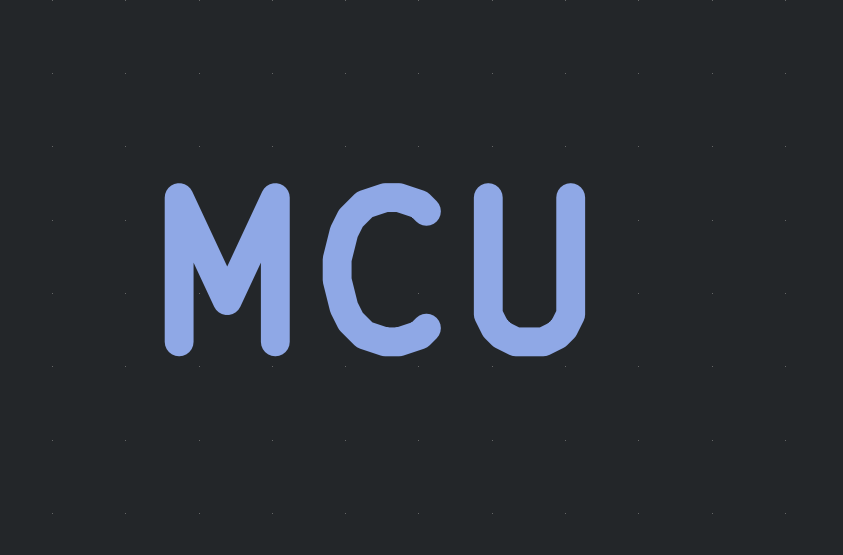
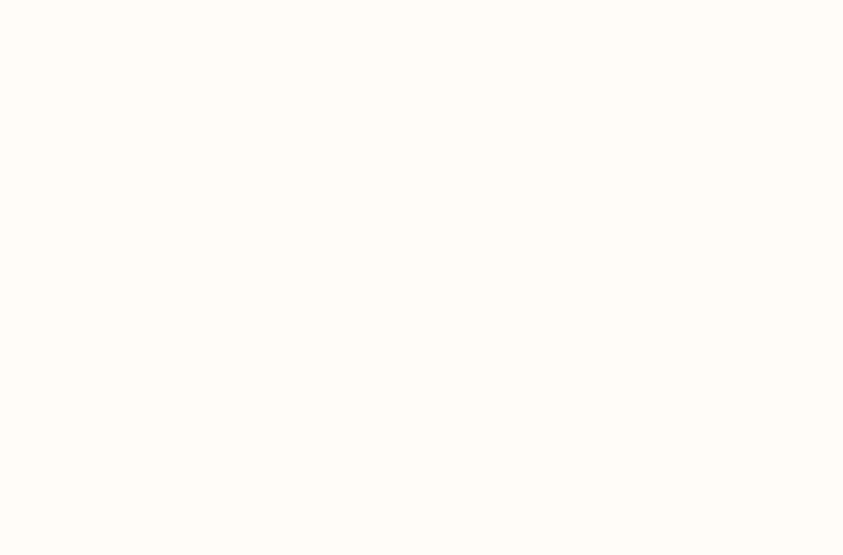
text: MCU (374, 269) -> none

